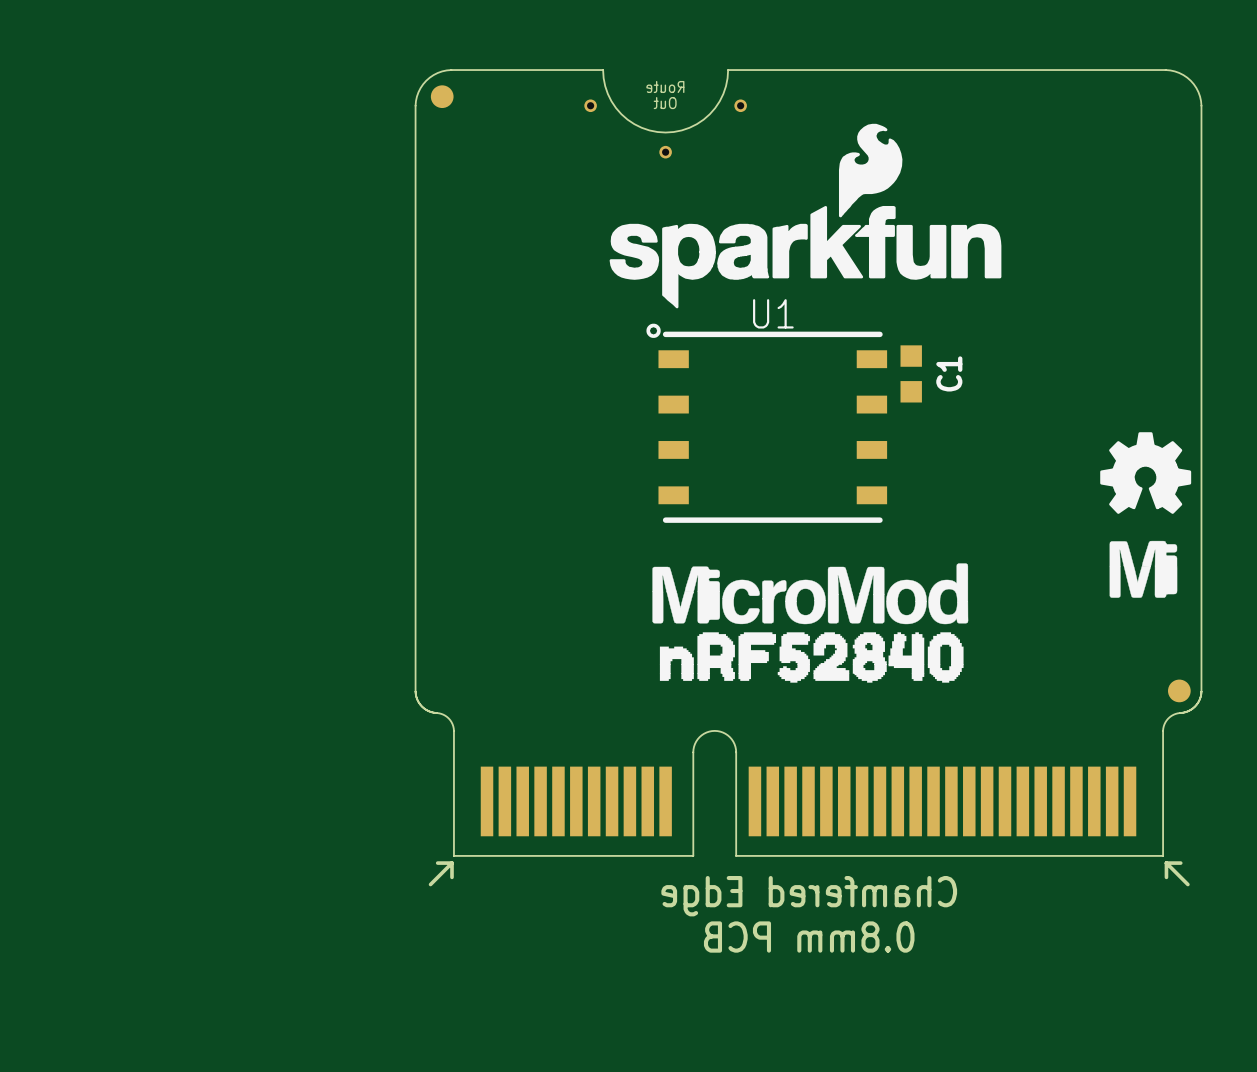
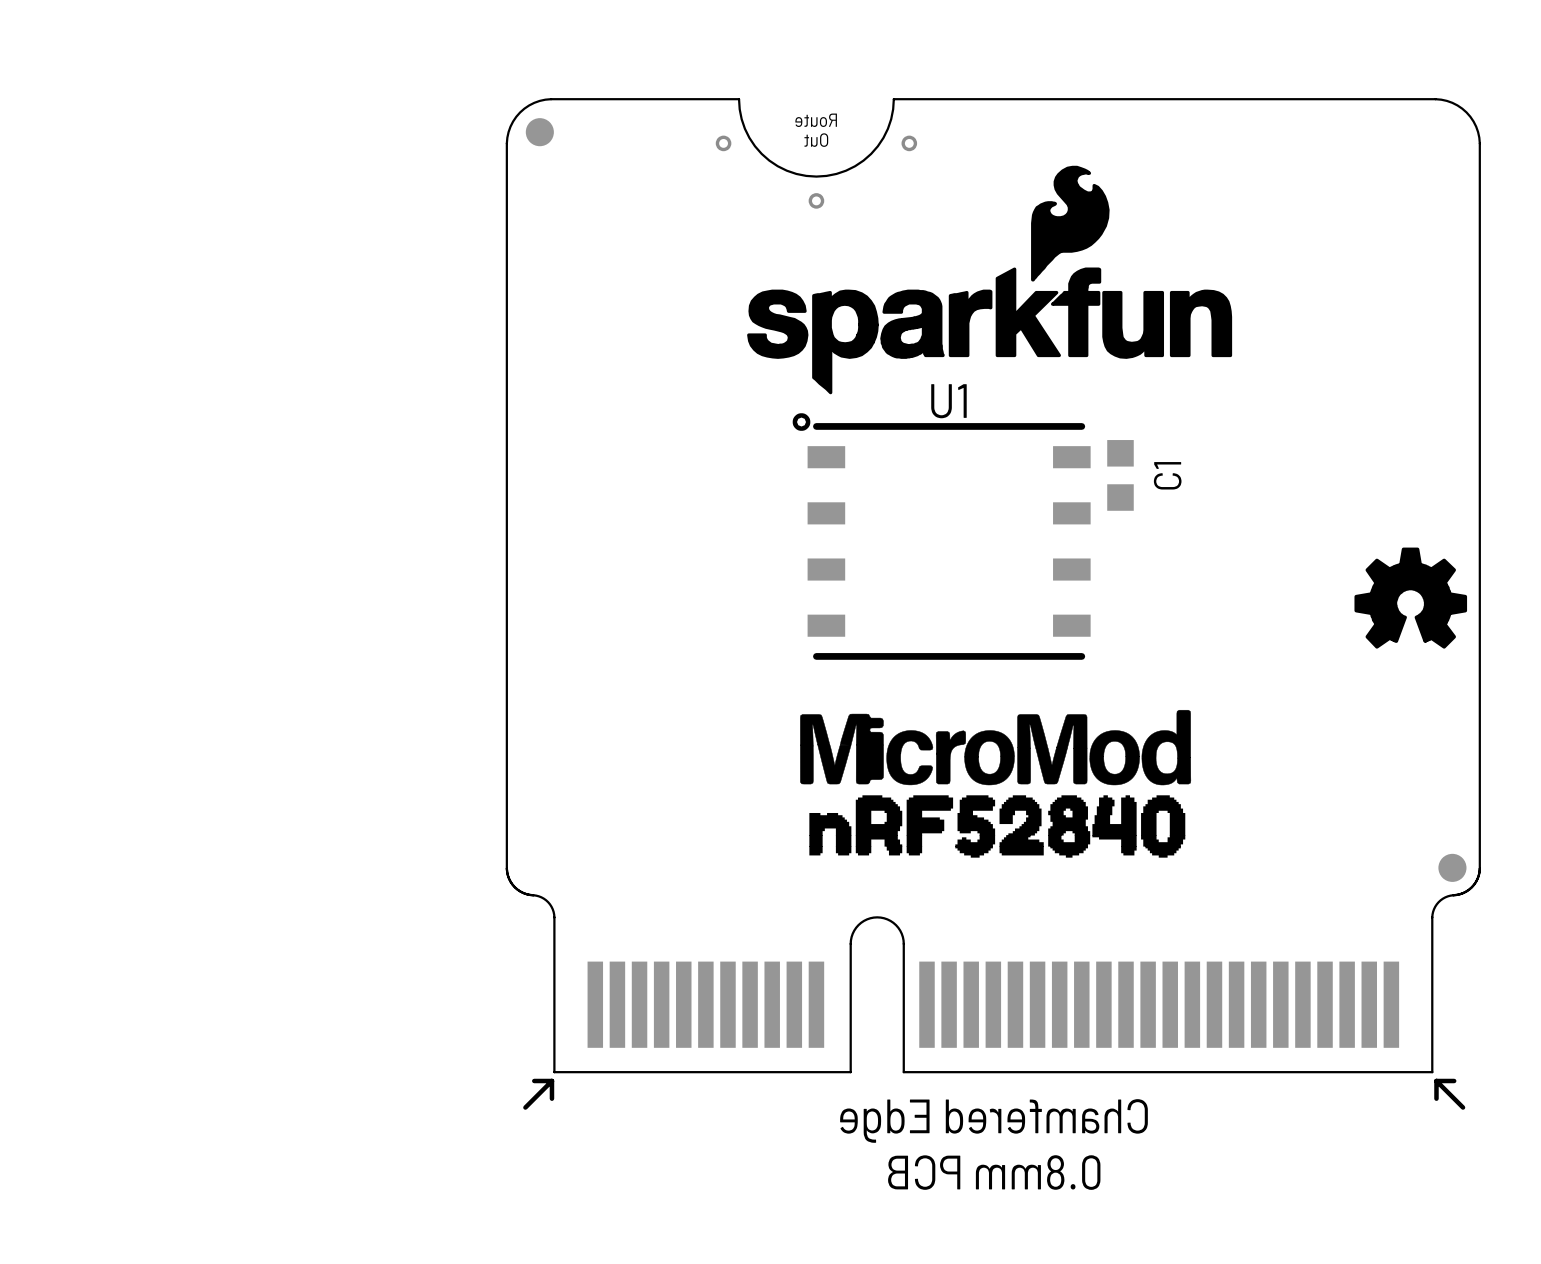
drawing: [1109, 540, 1178, 598] -> none

